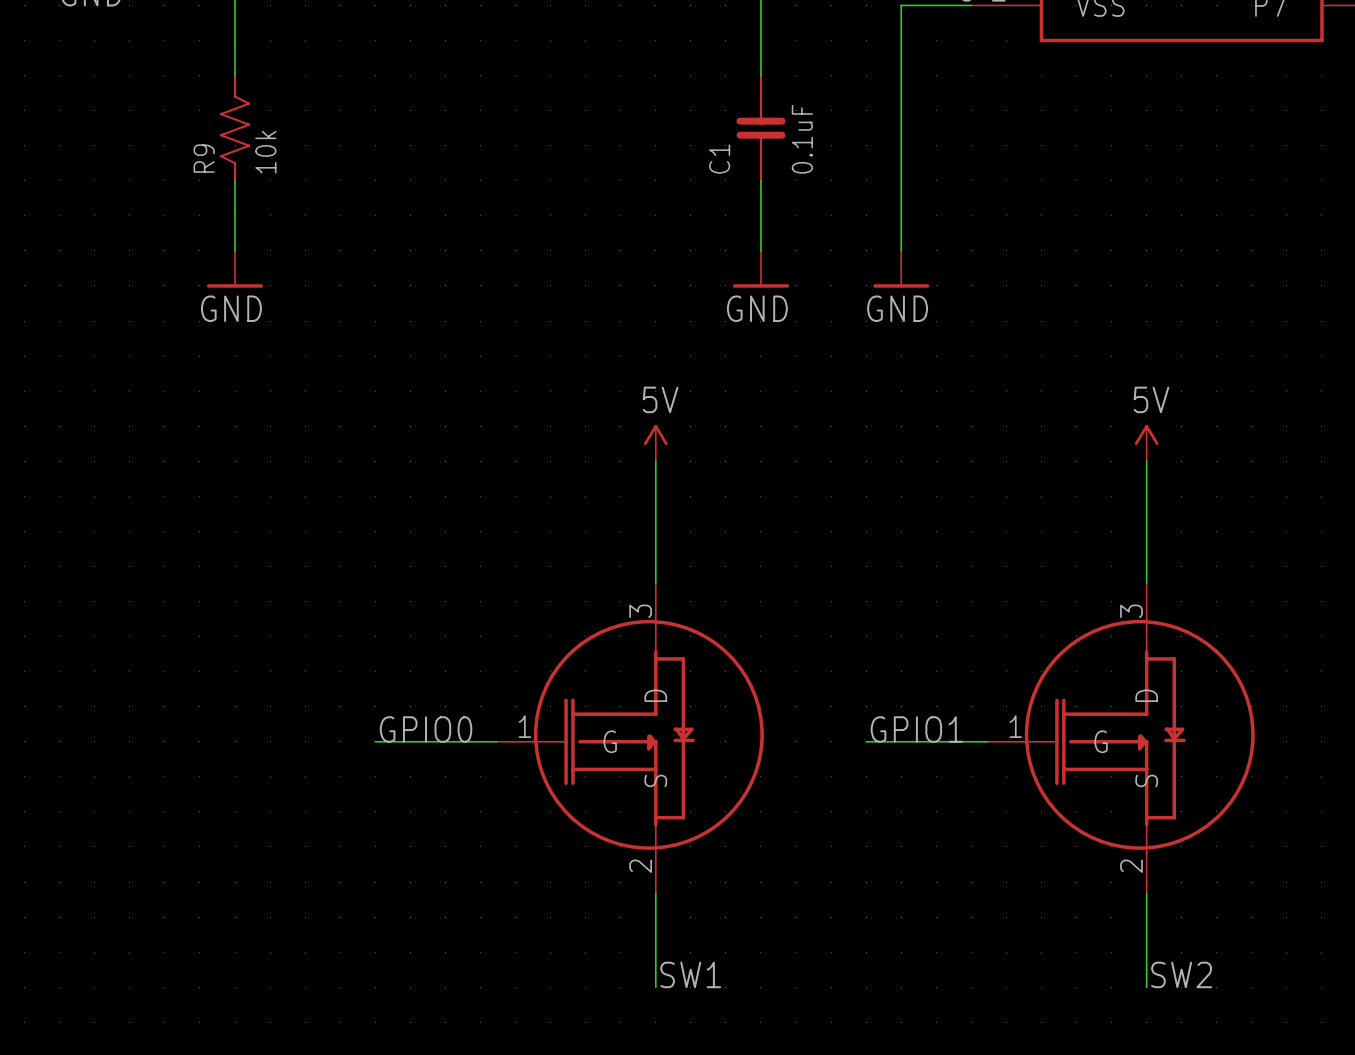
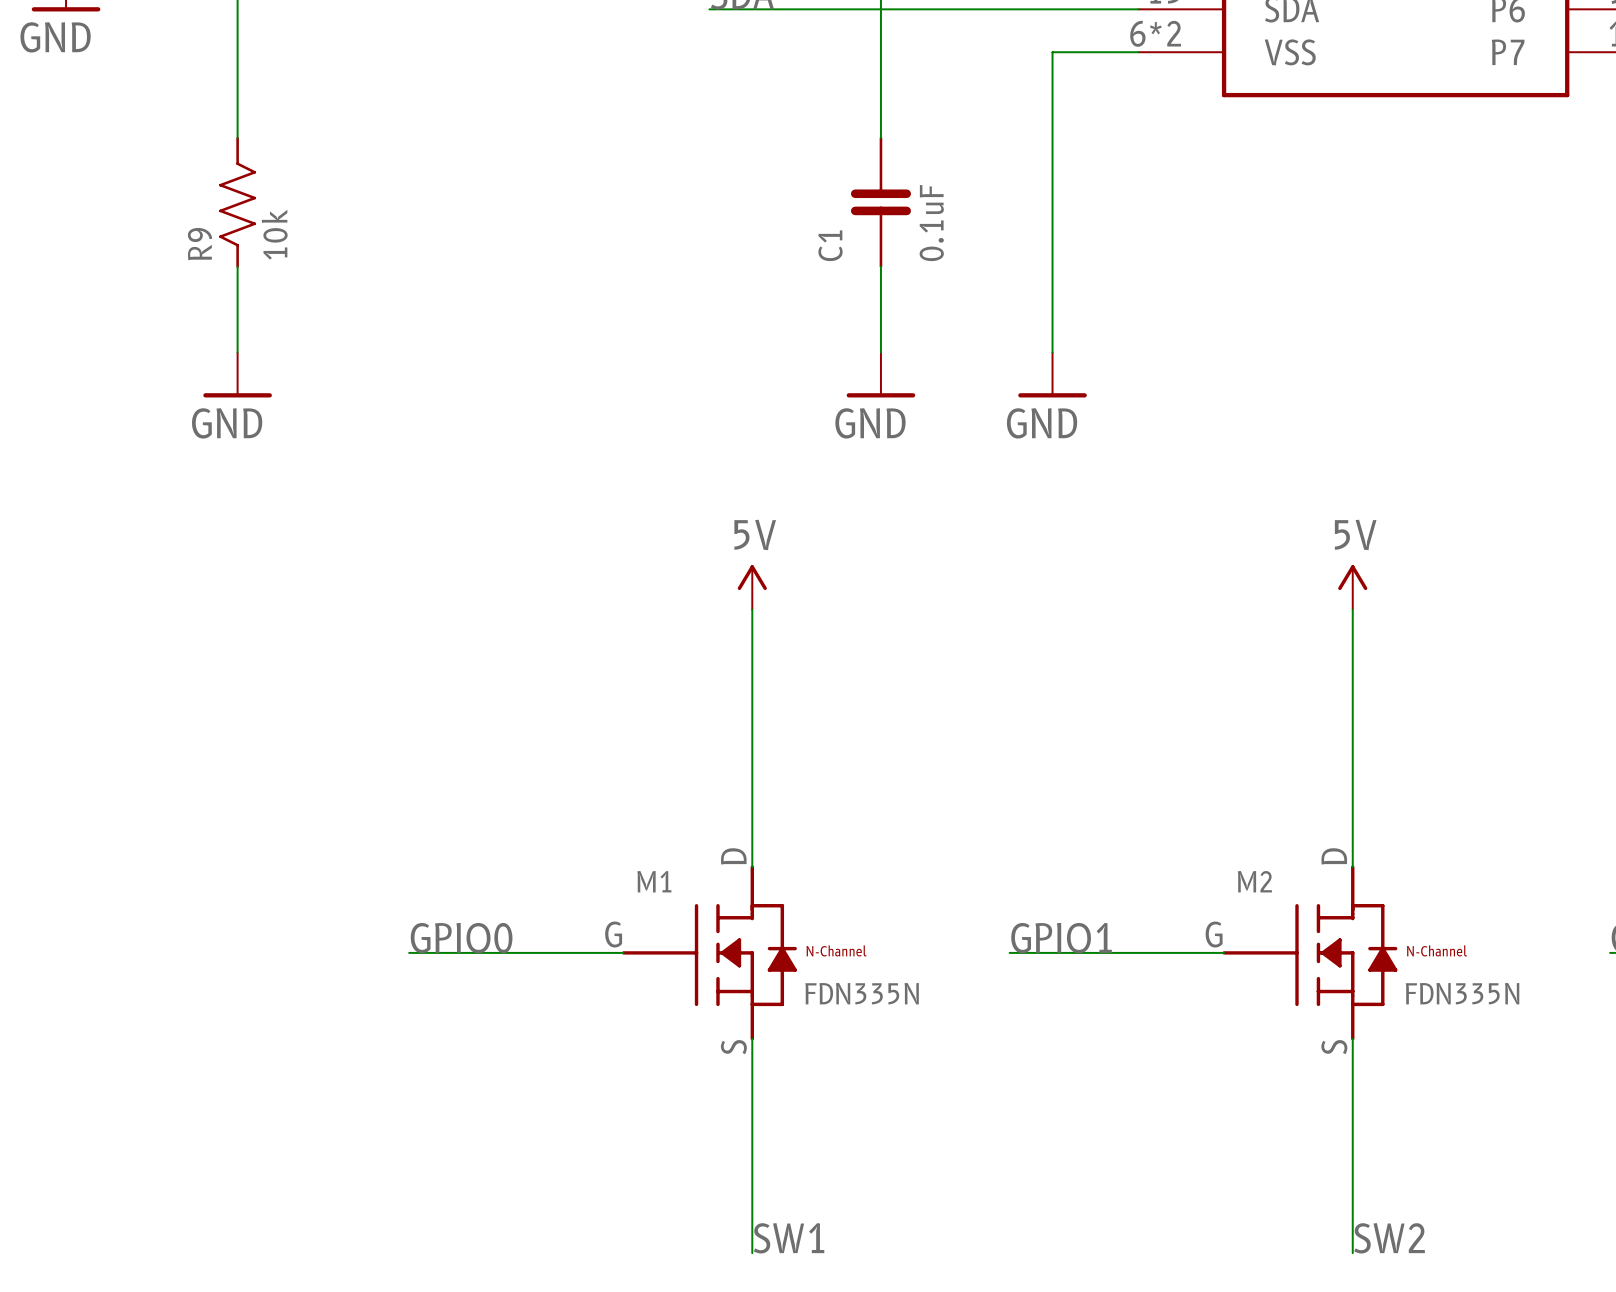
part: (630, 738) -> none
part: (1121, 738) -> none
M1: none -> FDN335N (709, 952)
M2: none -> FDN335N (1309, 952)

